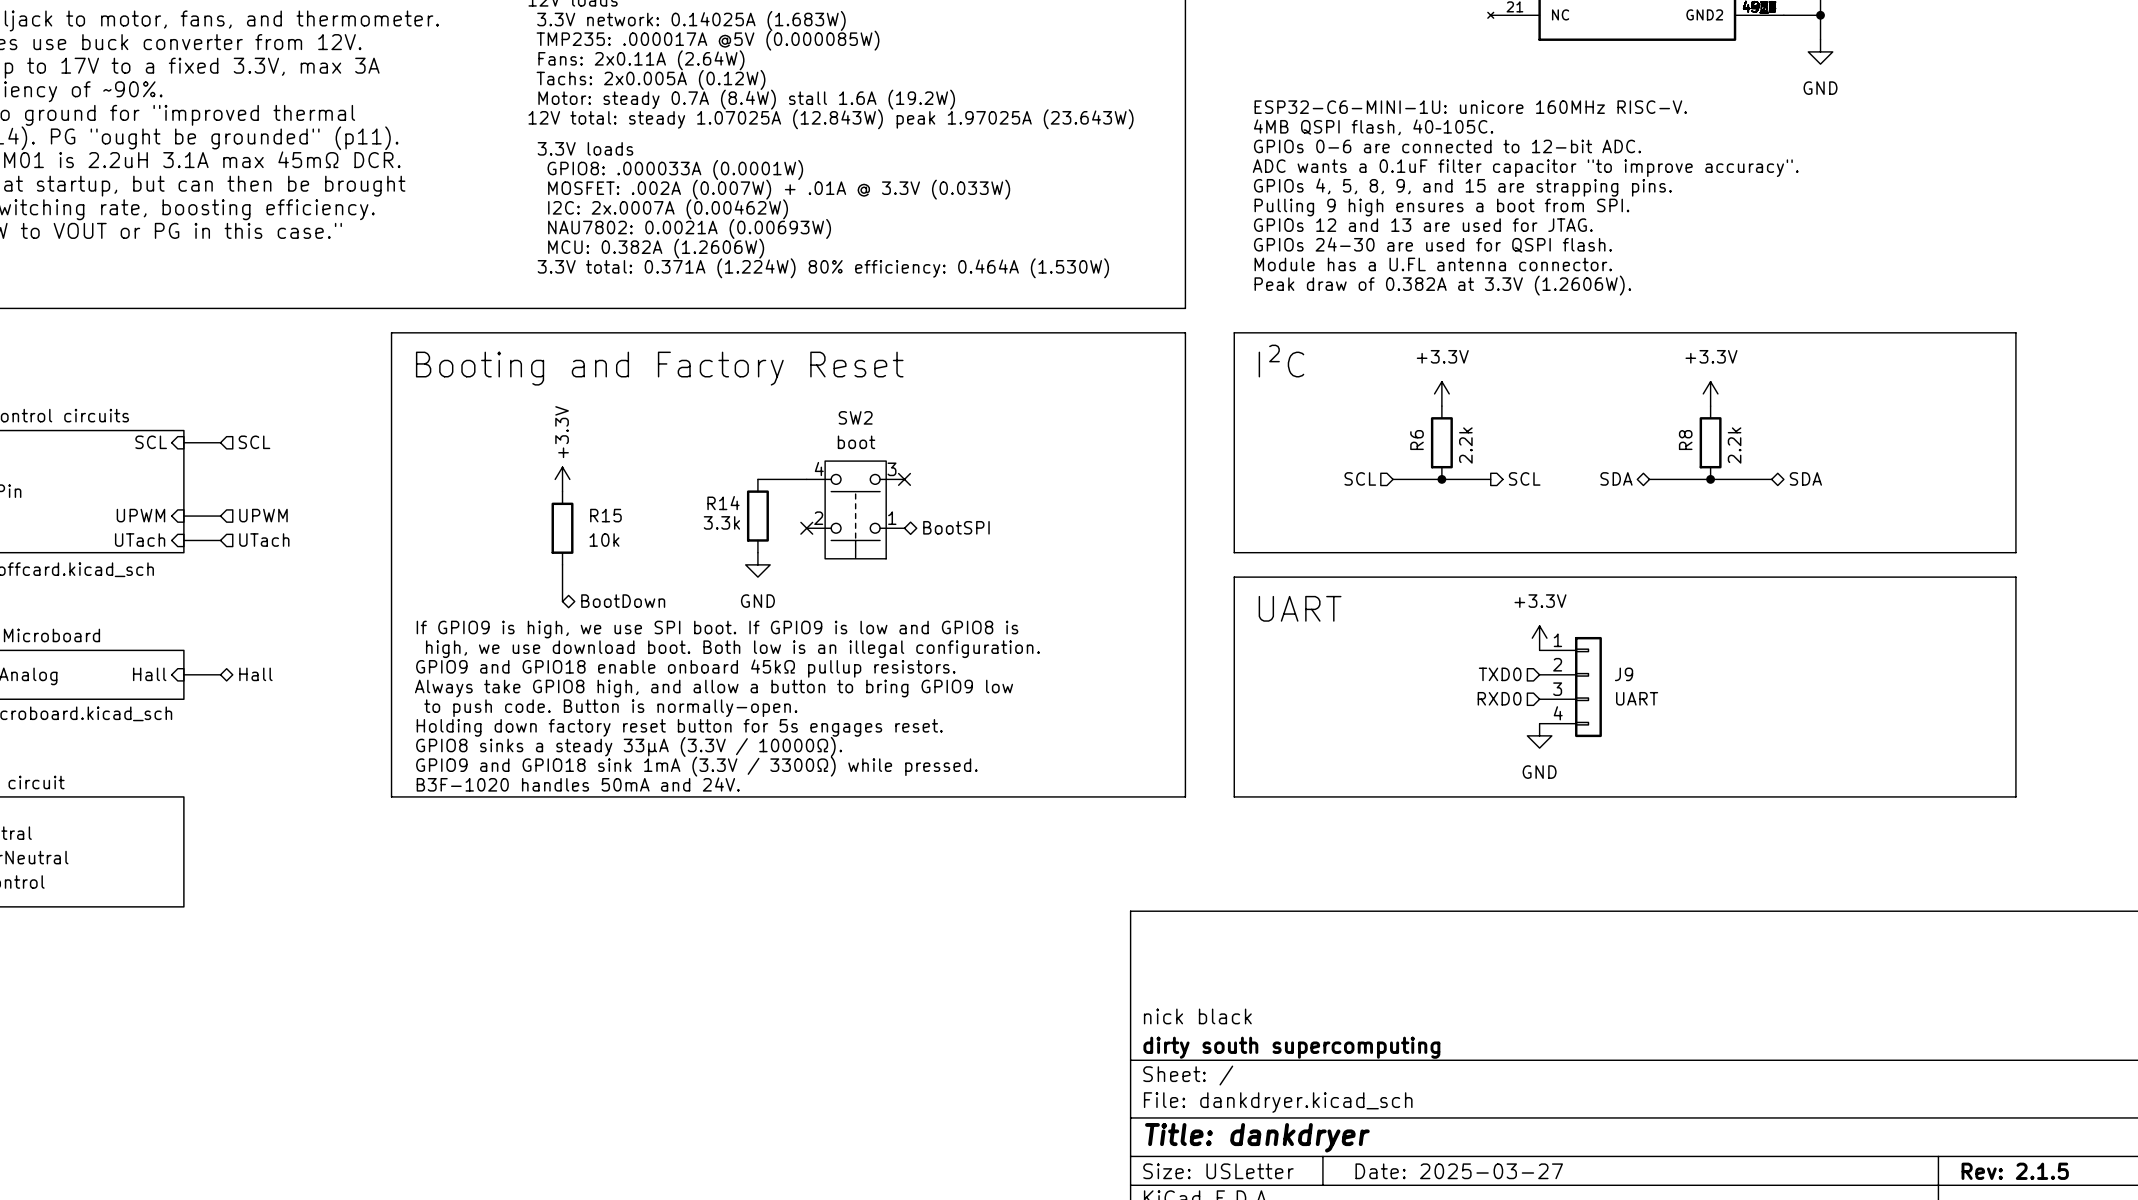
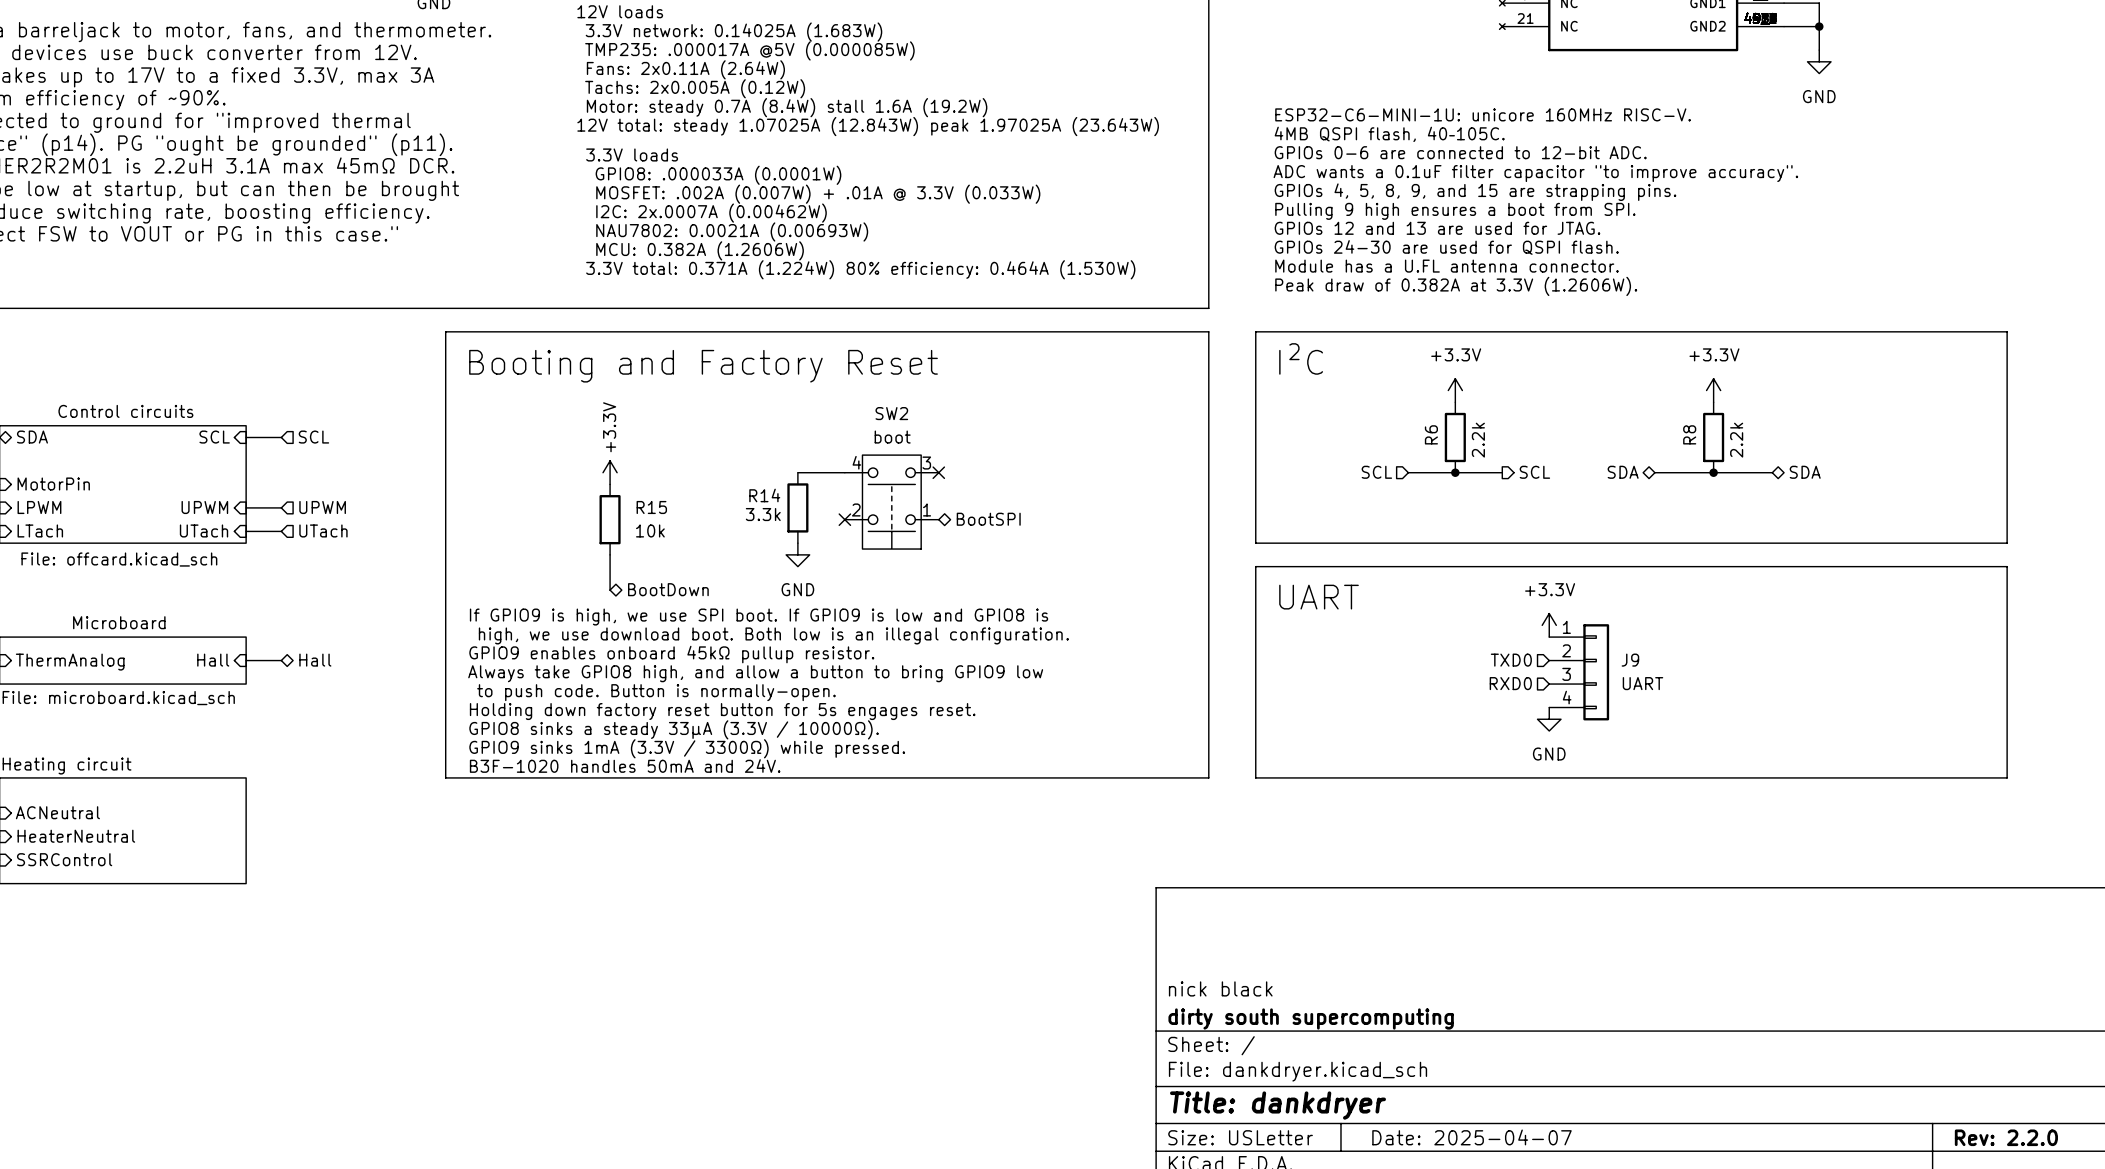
text: GPIO9 and GPIO18 enable onboard 45kΩ pullup resistors. (685, 668) -> GPIO9 enables onboard 45kΩ pullup resistor. (671, 654)
text: GPIO9 and GPIO18 sink 1mA (3.3V / 3300Ω) while pressed. (696, 766) -> GPIO9 sinks 1mA (3.3V / 3300Ω) while pressed. (687, 748)
title block: Date: 2025-03-27 (1459, 1171) -> Date: 2025-04-07 (1471, 1137)
title block: Rev: 2.1.5 (2015, 1171) -> Rev: 2.2.0 (2006, 1137)

